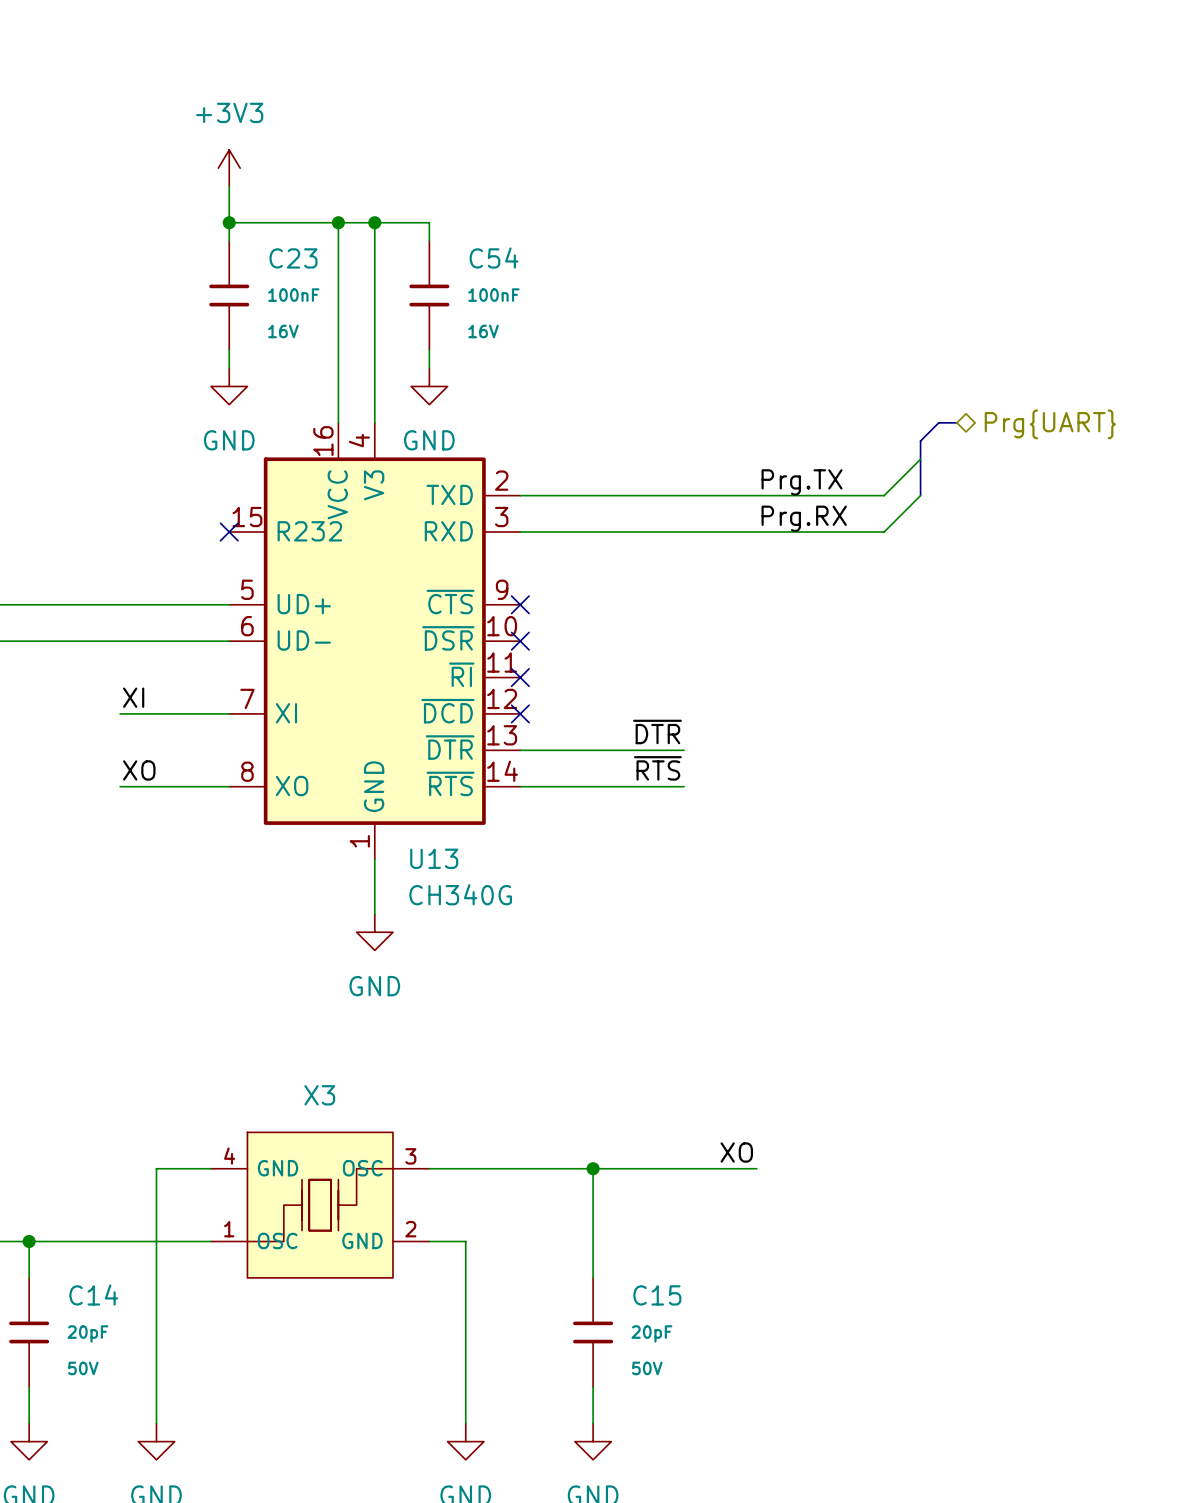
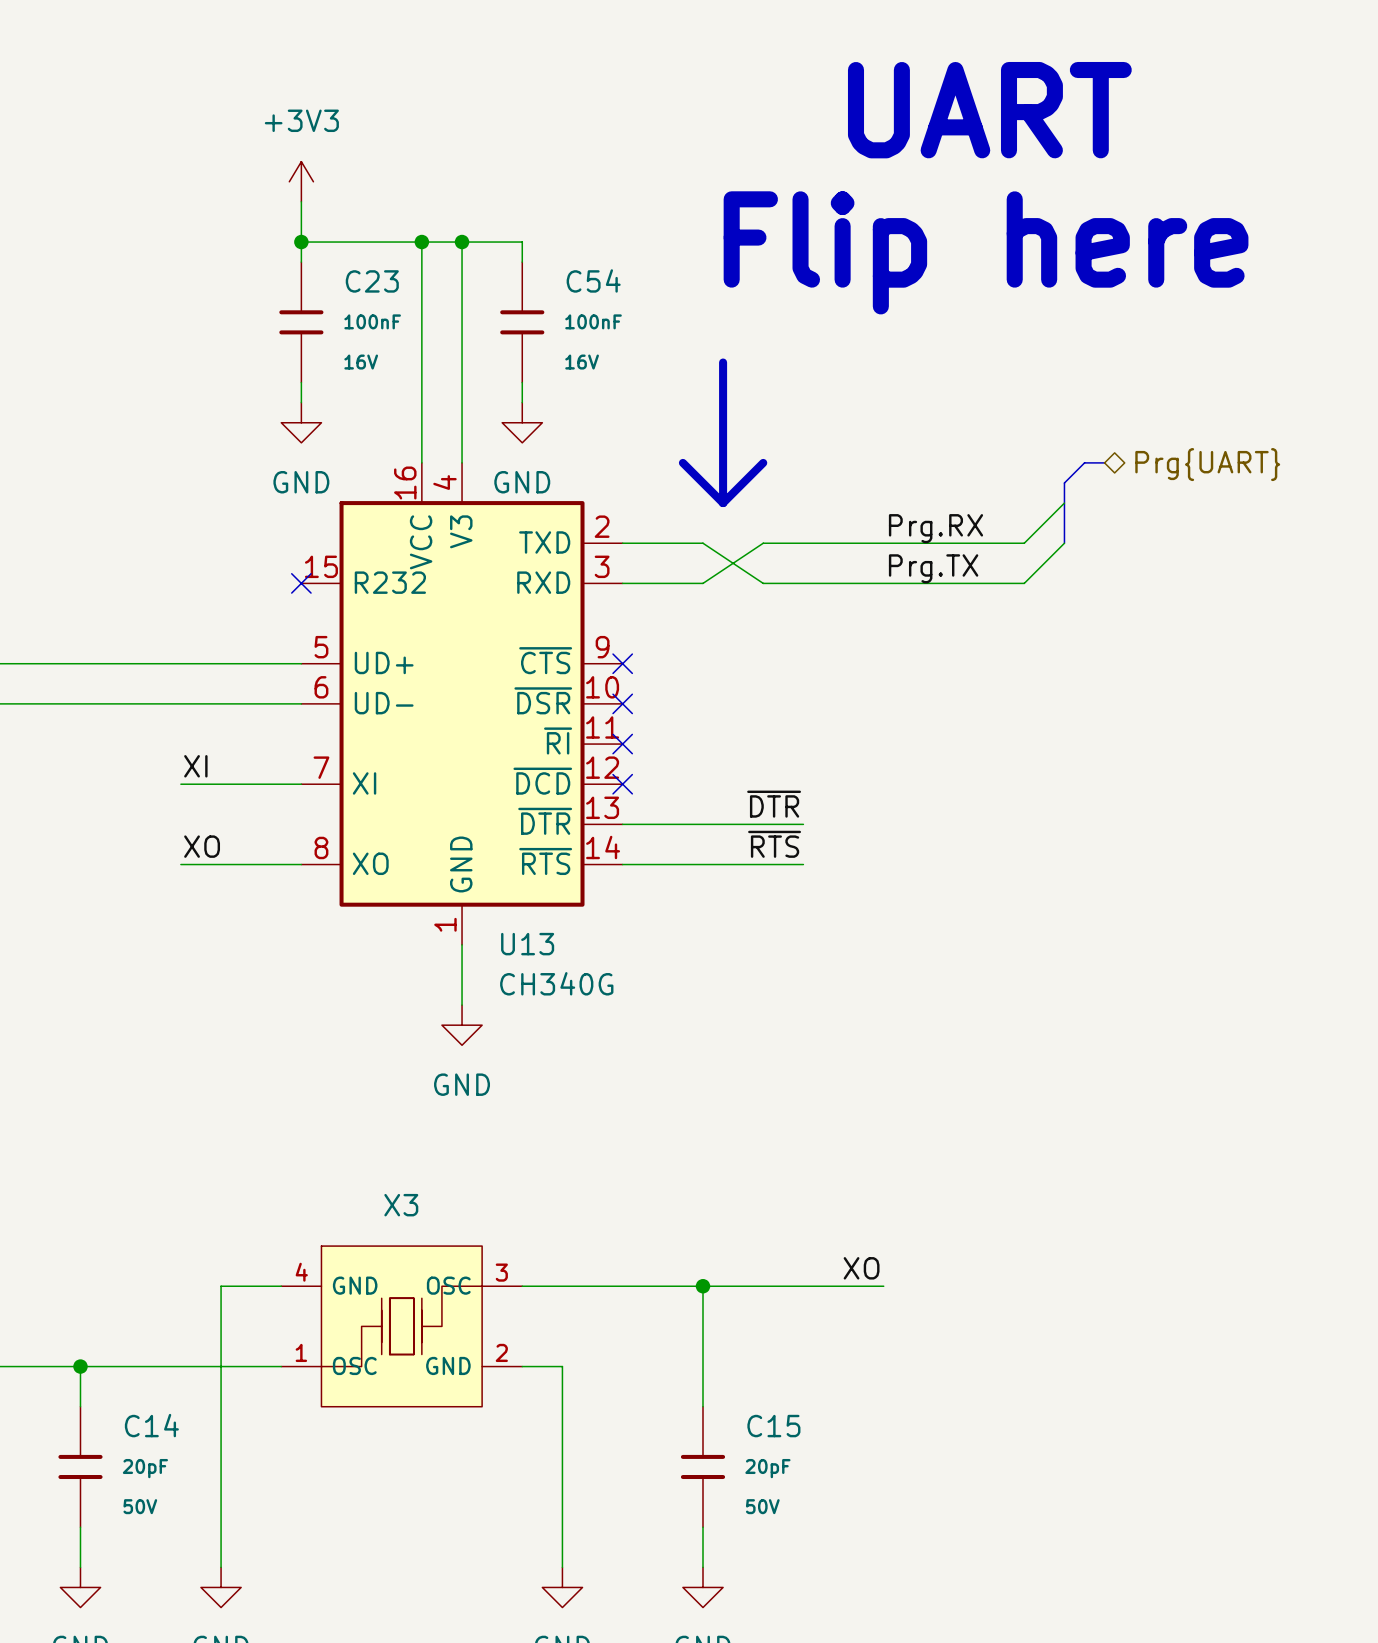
text: none -> UART (989, 110)
text: none -> Flip here (986, 252)
line: none -> (723, 362) (723, 503)
line: none -> (682, 462) (723, 503)
line: none -> (763, 462) (723, 503)
label: Prg.TX (802, 482) -> Prg.RX (935, 528)
wire: (593, 495) (647, 495) -> (703, 543) (763, 583)
label: Prg.RX (804, 518) -> Prg.TX (933, 568)
wire: (593, 532) (647, 532) -> (703, 583) (763, 543)

